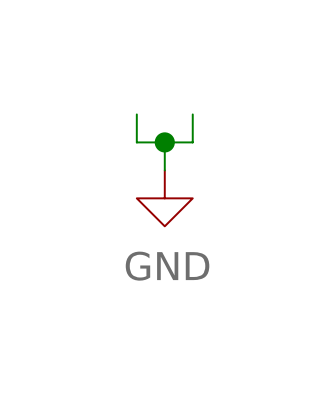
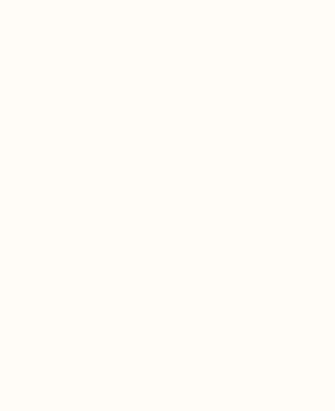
wire: (136, 114) (136, 142) (192, 142) (192, 114) -> none
wire: (164, 142) (164, 170) -> none
junction: (164, 142) -> none
power symbol: GND (164, 198) -> none

